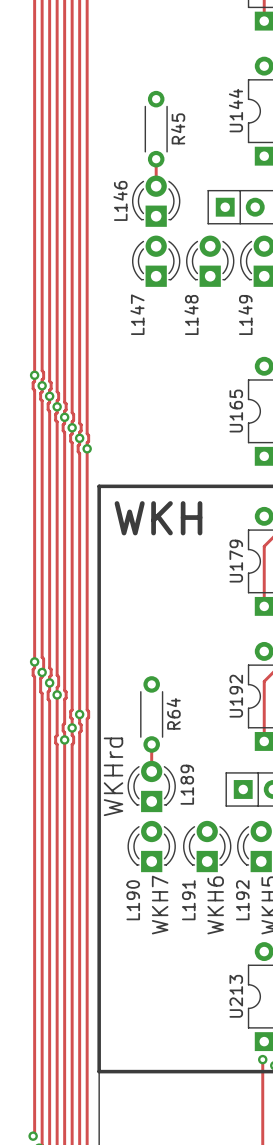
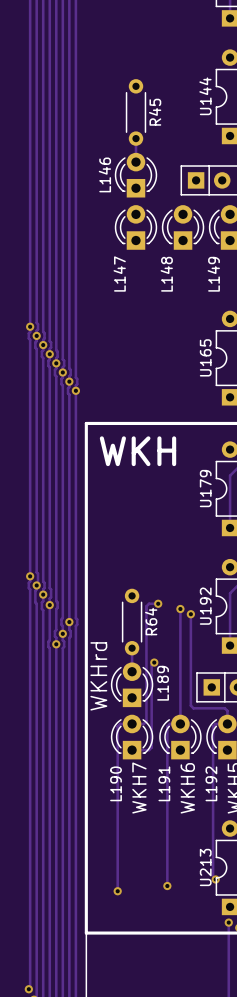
track: none -> (158, 603) (149, 603) (146, 606) (146, 721) (143, 723) (120, 723) (117, 726) (117, 891)
via: none -> (158, 603)
track: none -> (180, 609) (180, 723) (169, 723) (167, 726) (167, 886)
via: none -> (180, 609)
track: none -> (190, 614) (190, 705) (193, 708) (224, 708) (227, 710) (227, 723) (215, 723) (213, 726) (213, 876) (215, 879)
via: none -> (190, 614)
track: none -> (154, 662) (151, 665) (151, 747) (149, 750) (132, 750)
via: none -> (154, 662)
via: none -> (215, 879)
via: none -> (167, 886)
via: none -> (117, 891)

